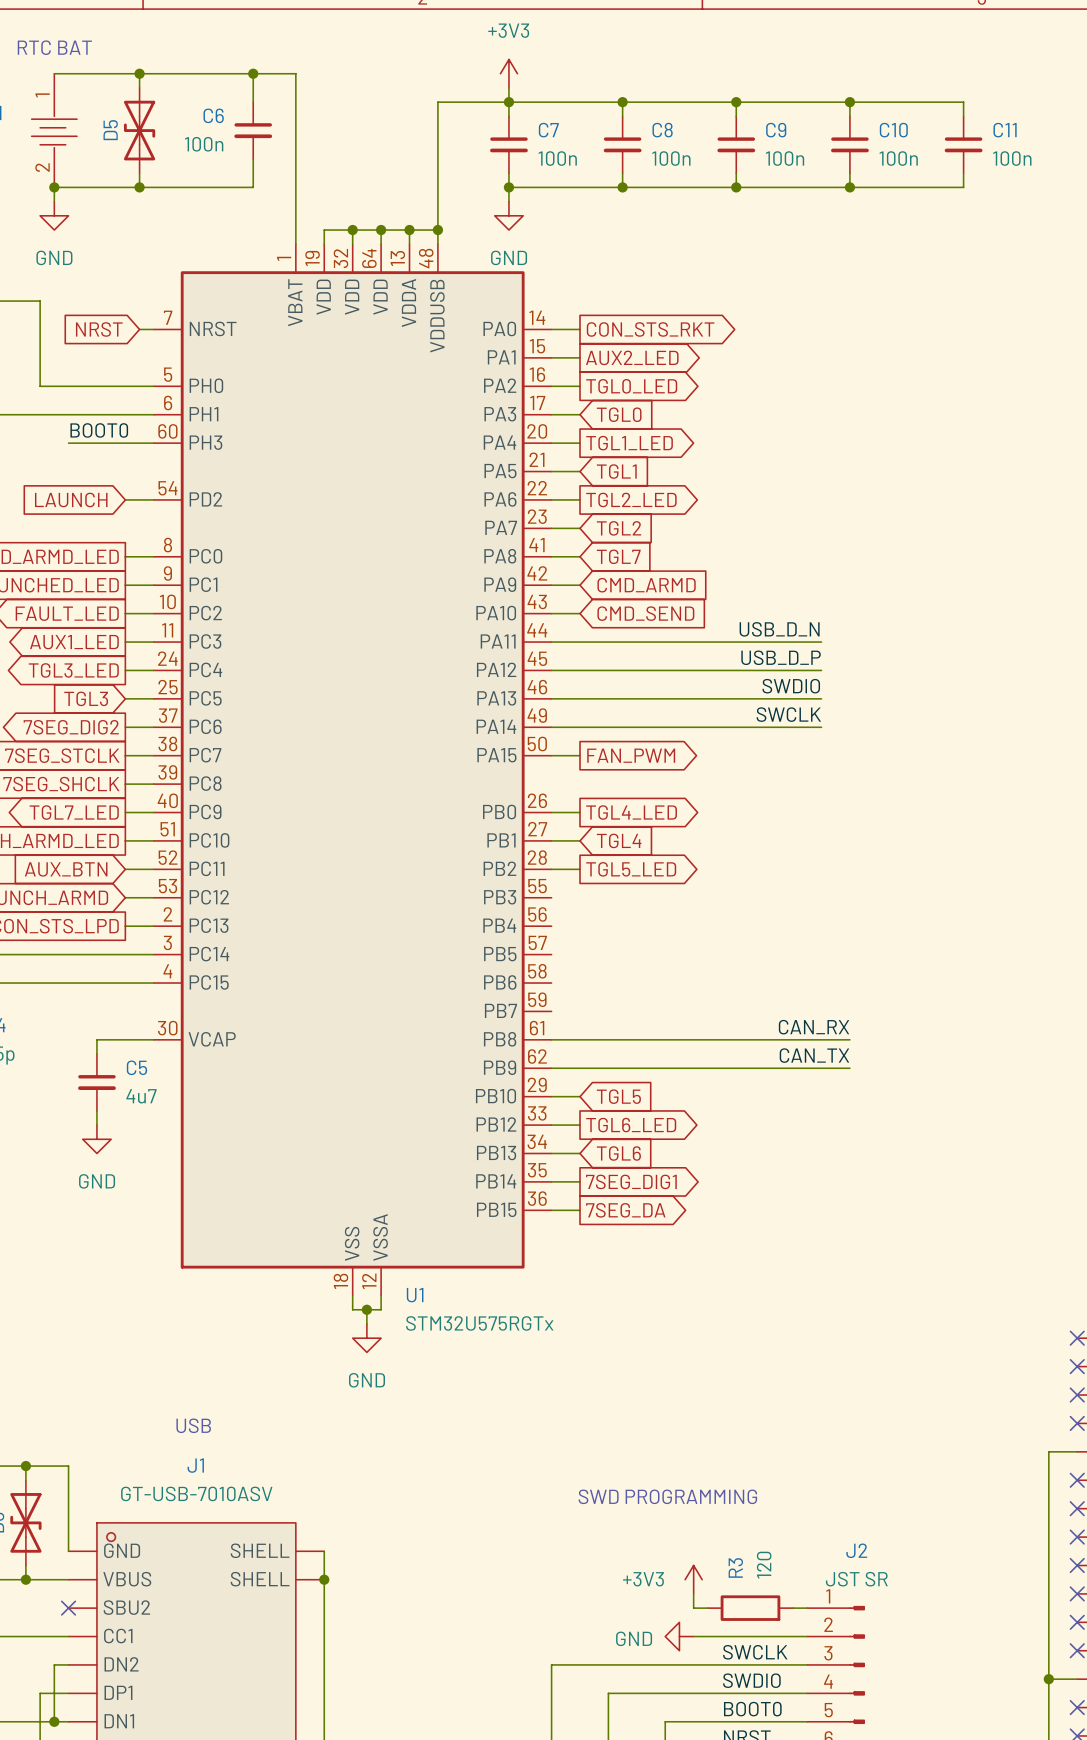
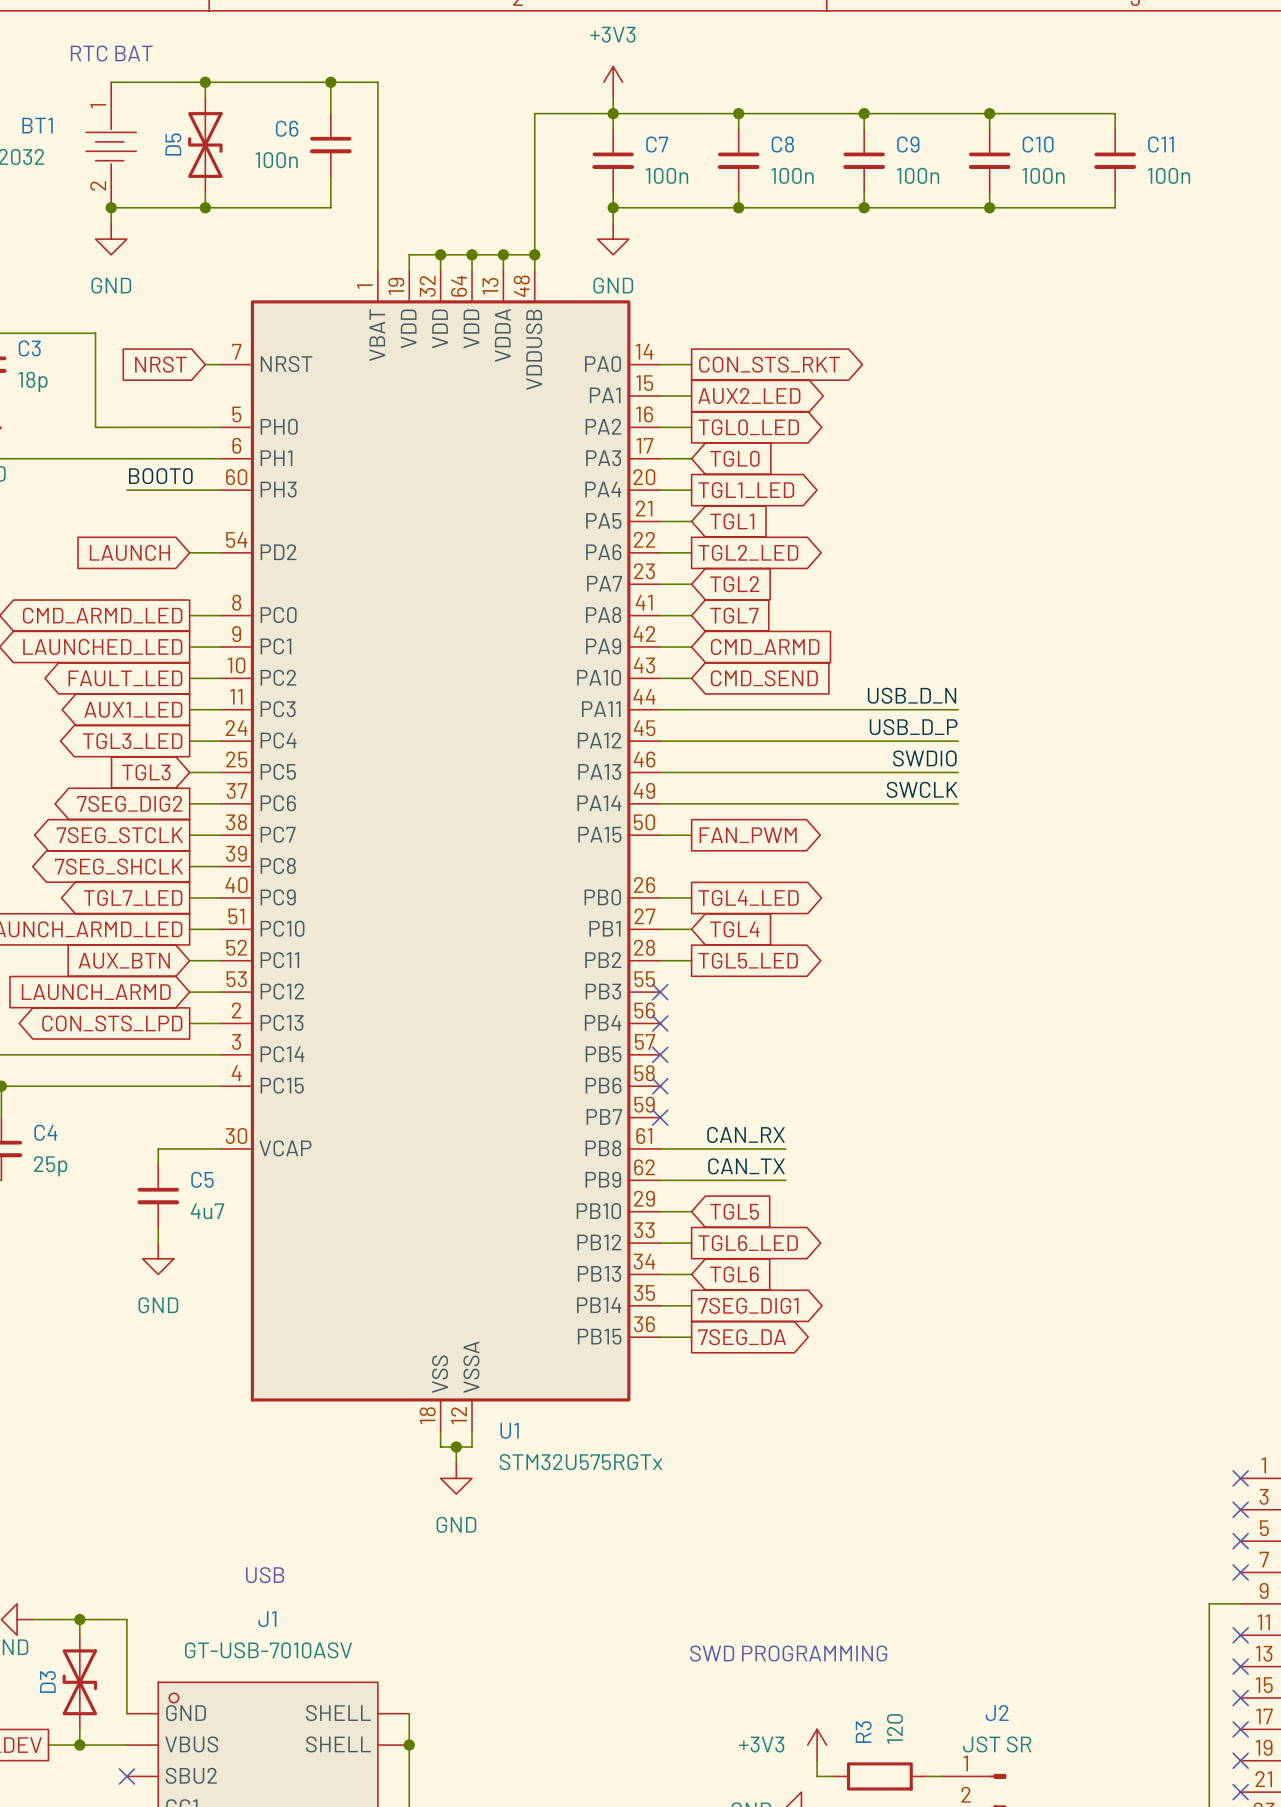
no-connect mark: none -> (660, 992)
no-connect mark: none -> (660, 1023)
no-connect mark: none -> (660, 1054)
no-connect mark: none -> (660, 1086)
no-connect mark: none -> (660, 1117)
label position: CAN_RX (814, 1027) -> CAN_RX (746, 1134)
wire: (665, 1039) (849, 1039) -> none
label position: CAN_TX (814, 1055) -> CAN_TX (746, 1166)
wire: (665, 1068) (849, 1068) -> none

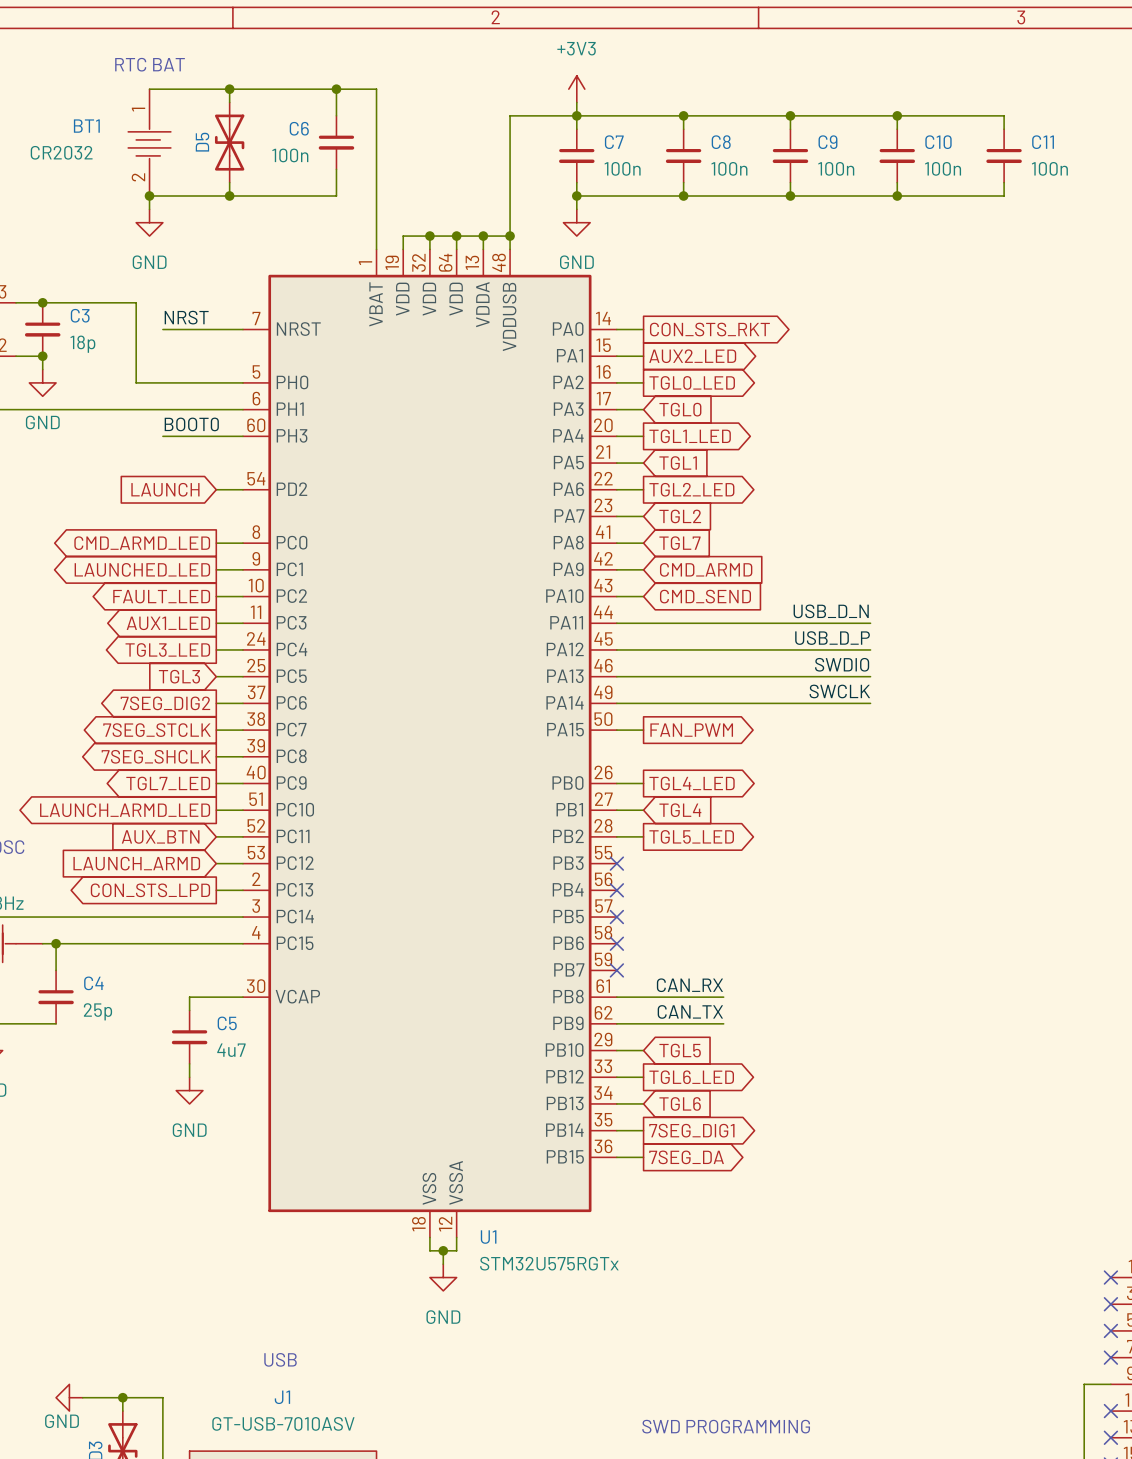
label: none -> NRST (186, 317)
wire: none -> (162, 329) (229, 329)
global label: NRST (160, 364) -> none

